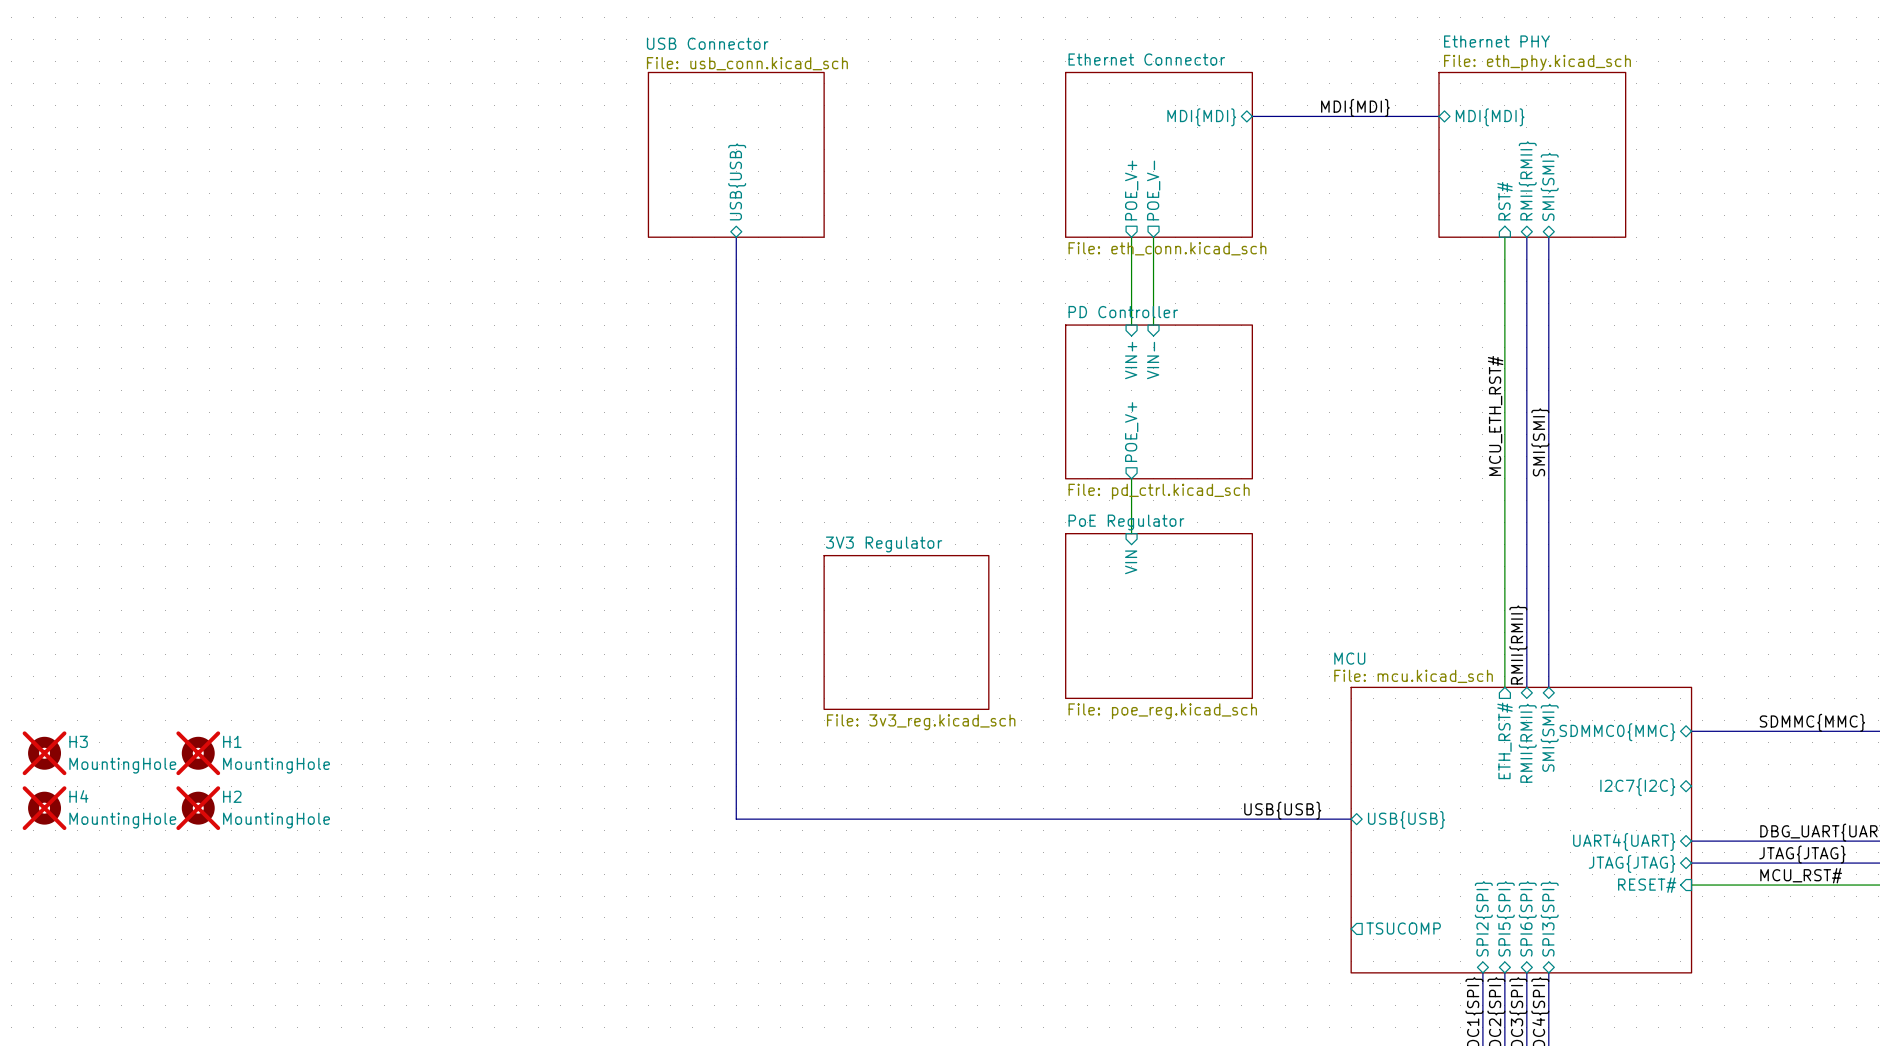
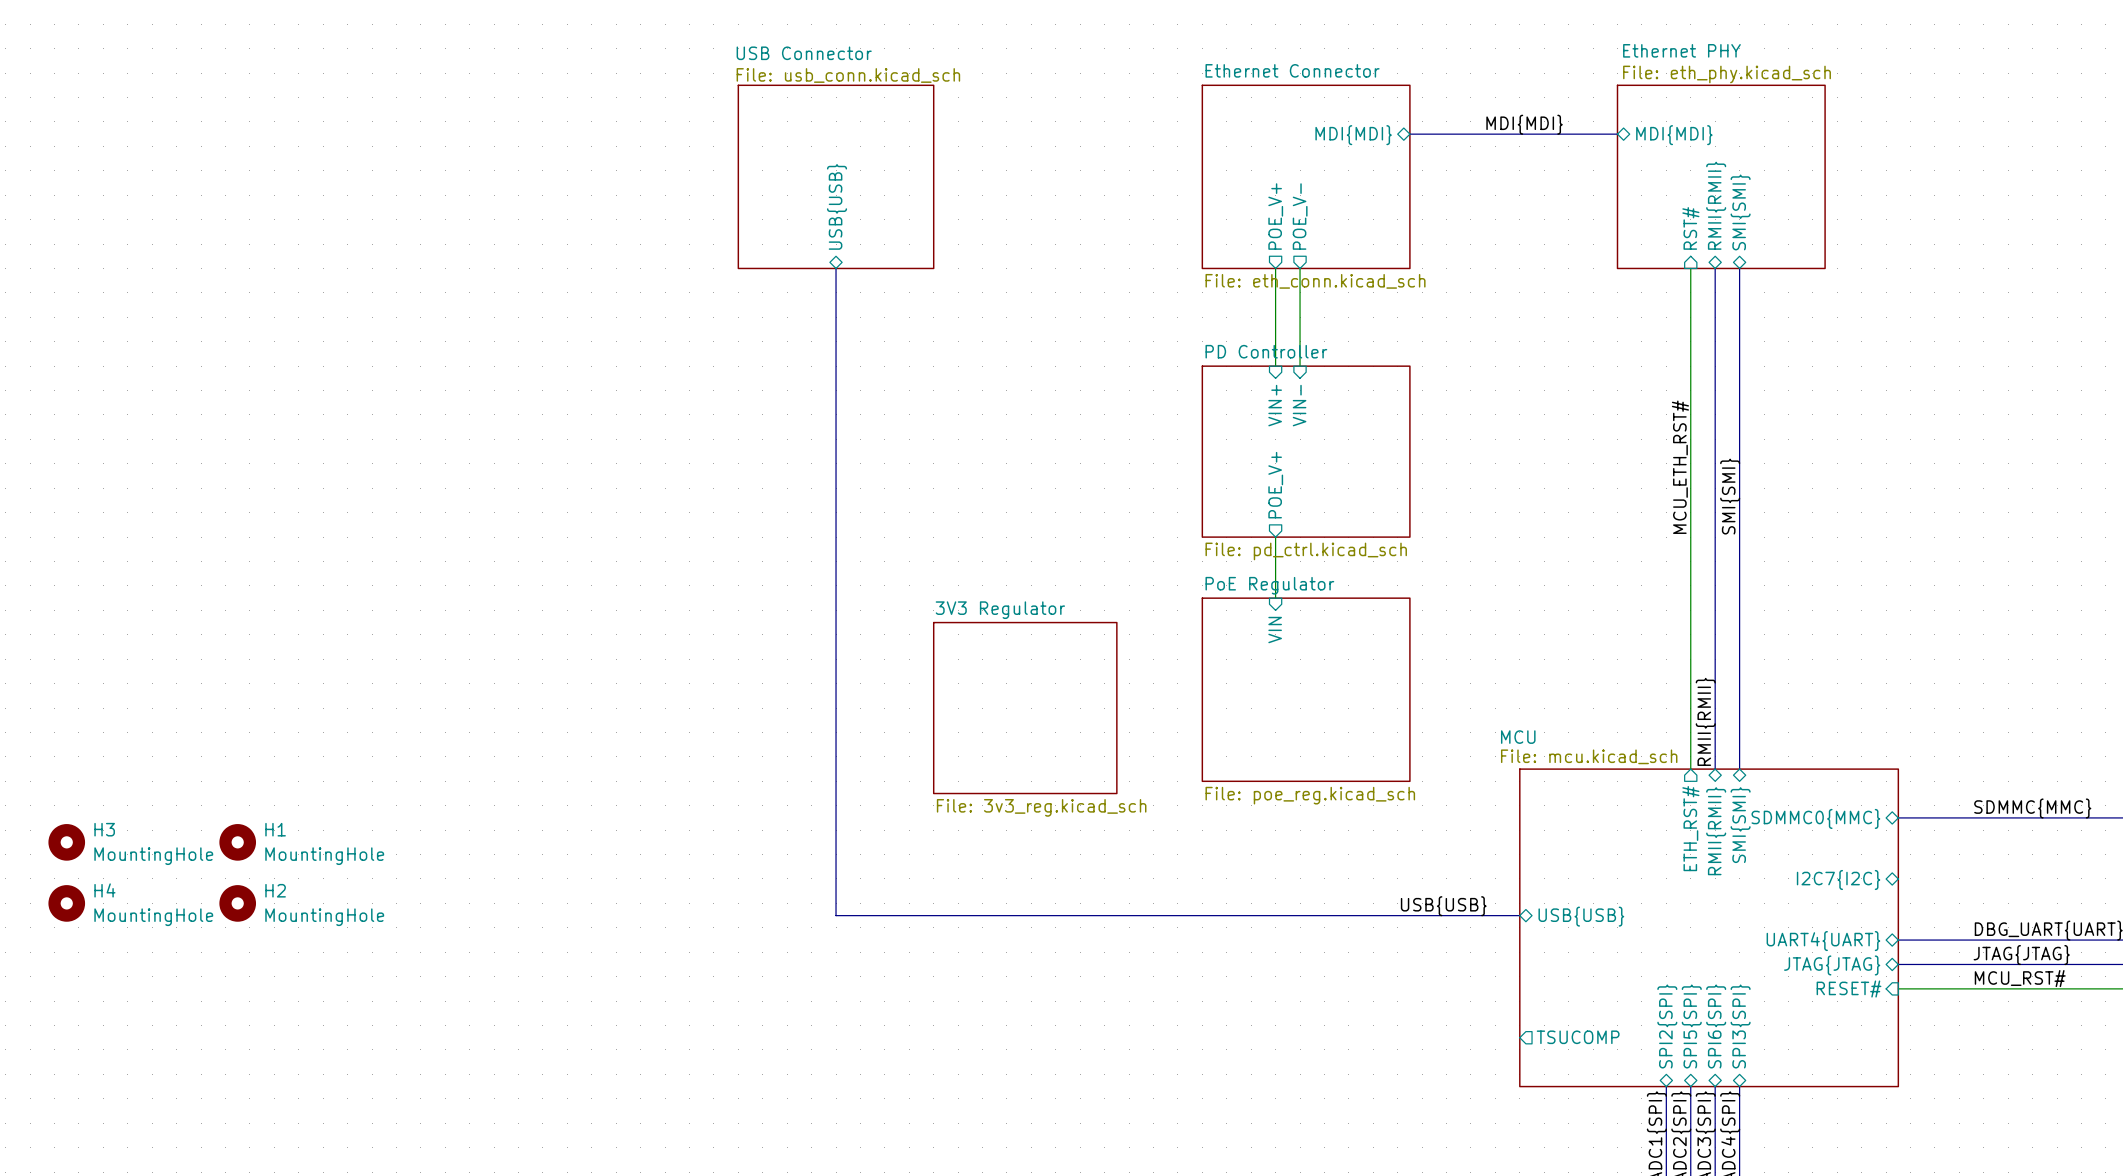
H3 do-not-place cross: (44, 753) -> none
H1 do-not-place cross: (198, 753) -> none
H4 do-not-place cross: (44, 808) -> none
H2 do-not-place cross: (198, 808) -> none

